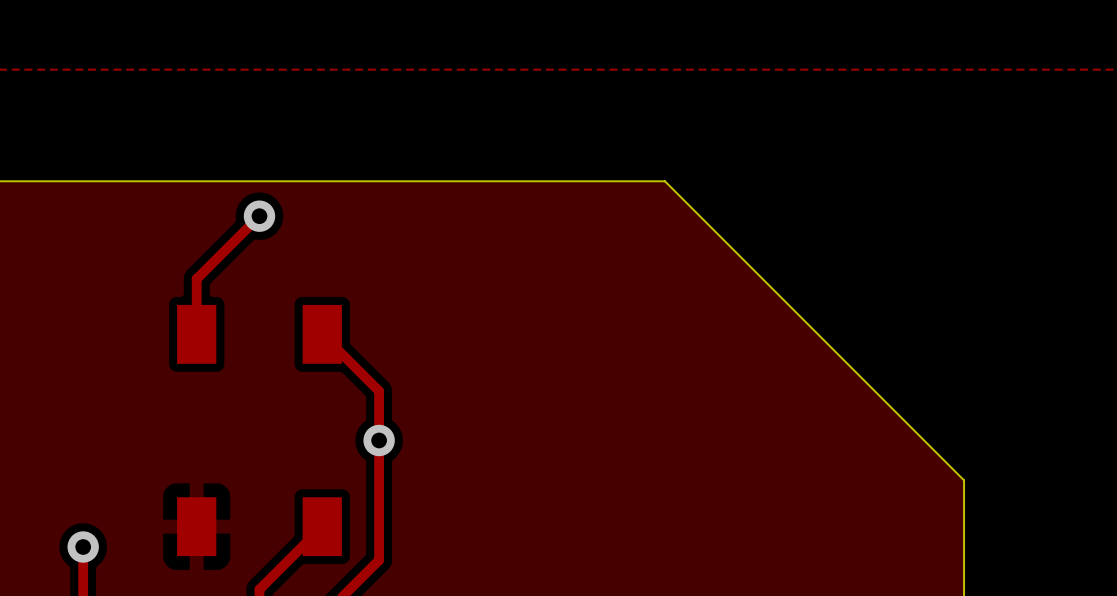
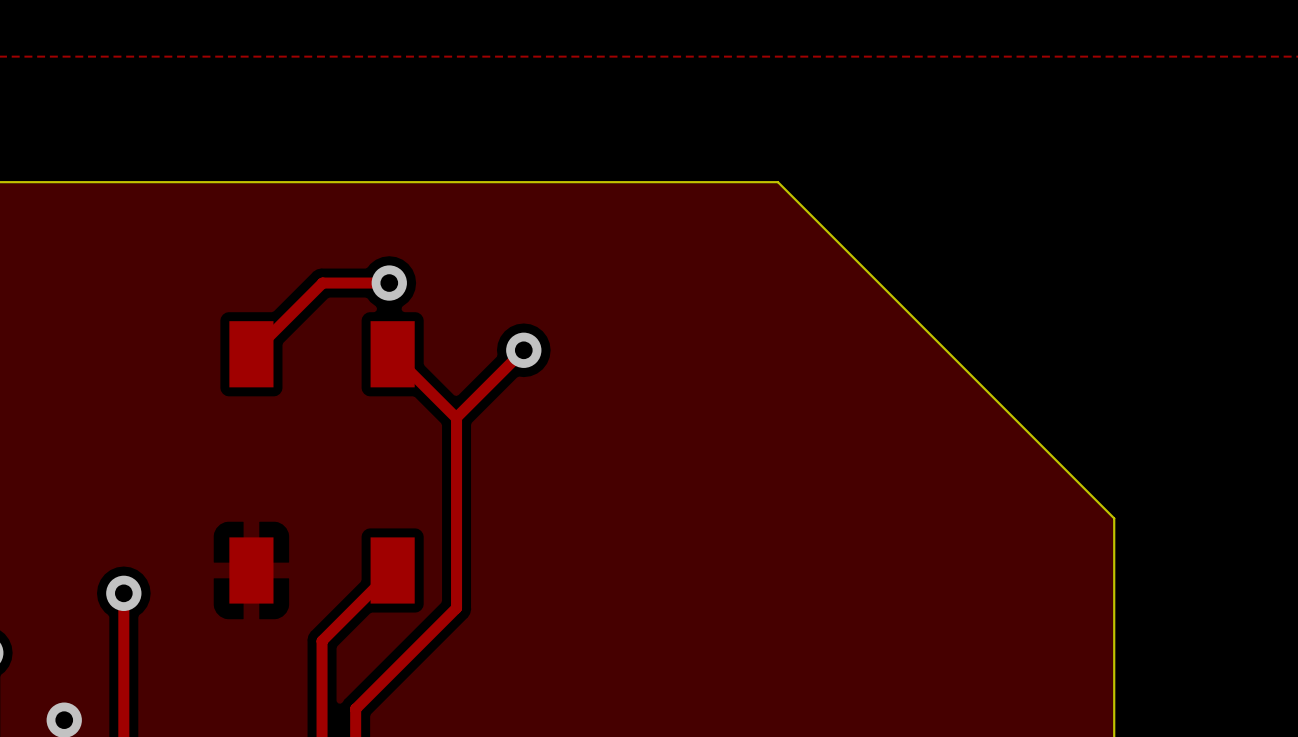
track: (259, 216) (196, 278) (196, 334) -> (389, 283) (322, 283) (251, 354)
via position: (259, 216) -> (389, 283)
track: none -> (523, 350) (456, 417)
via: none -> (523, 350)
via: (379, 440) -> none

